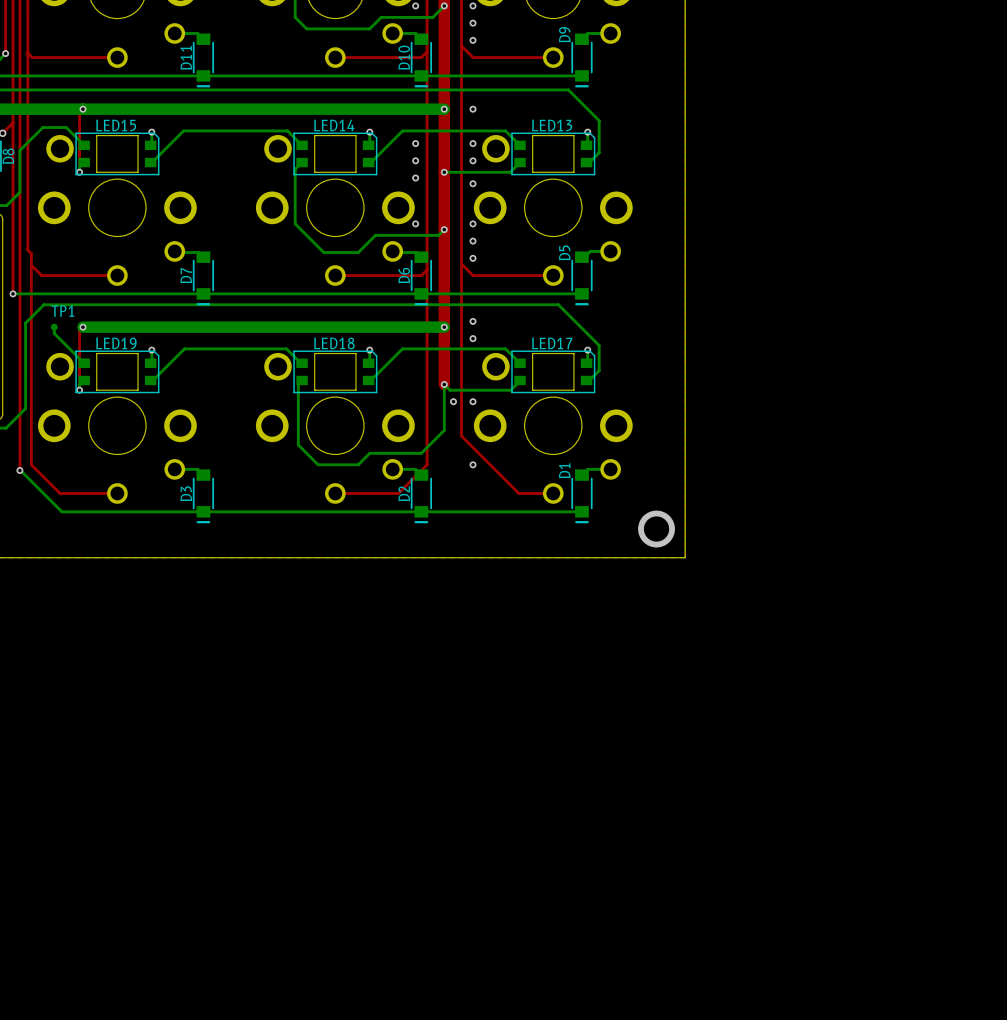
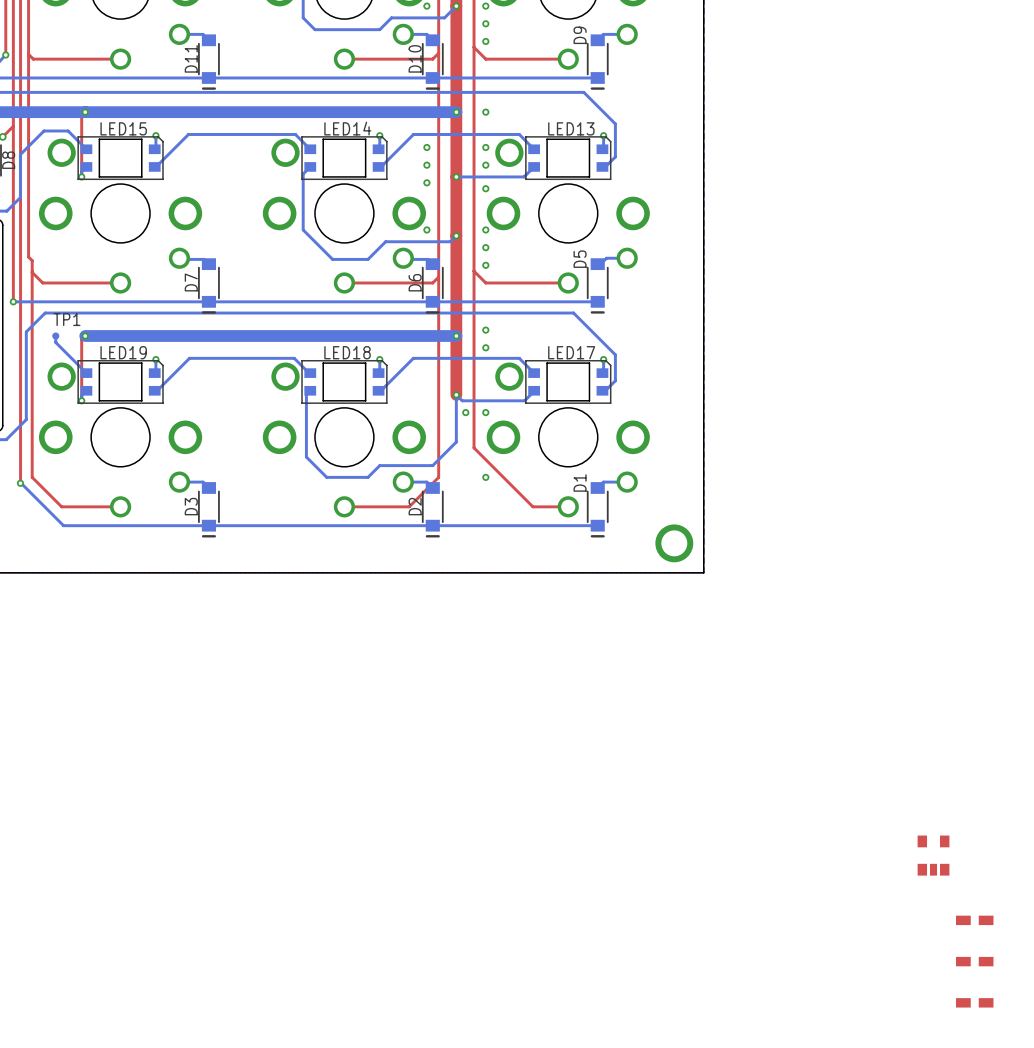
part: none -> (933, 855)
part: none -> (974, 920)
part: none -> (974, 961)
part: none -> (974, 1002)

